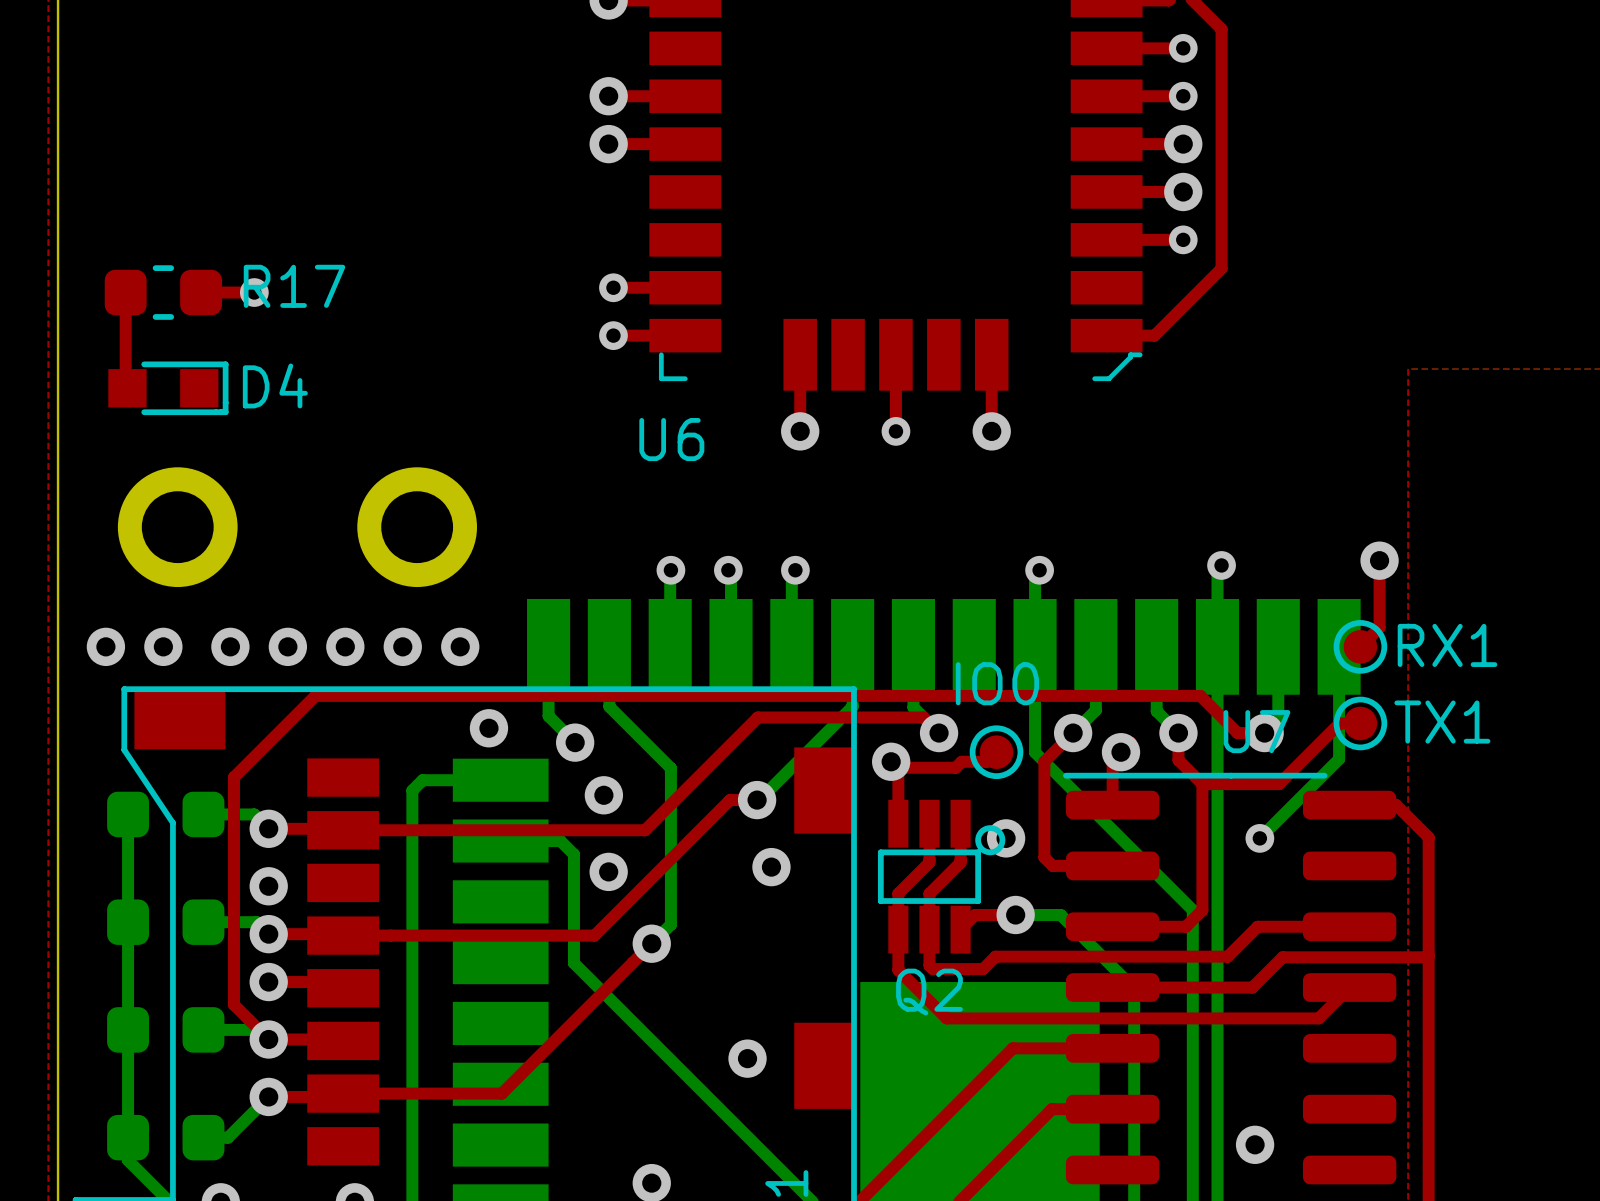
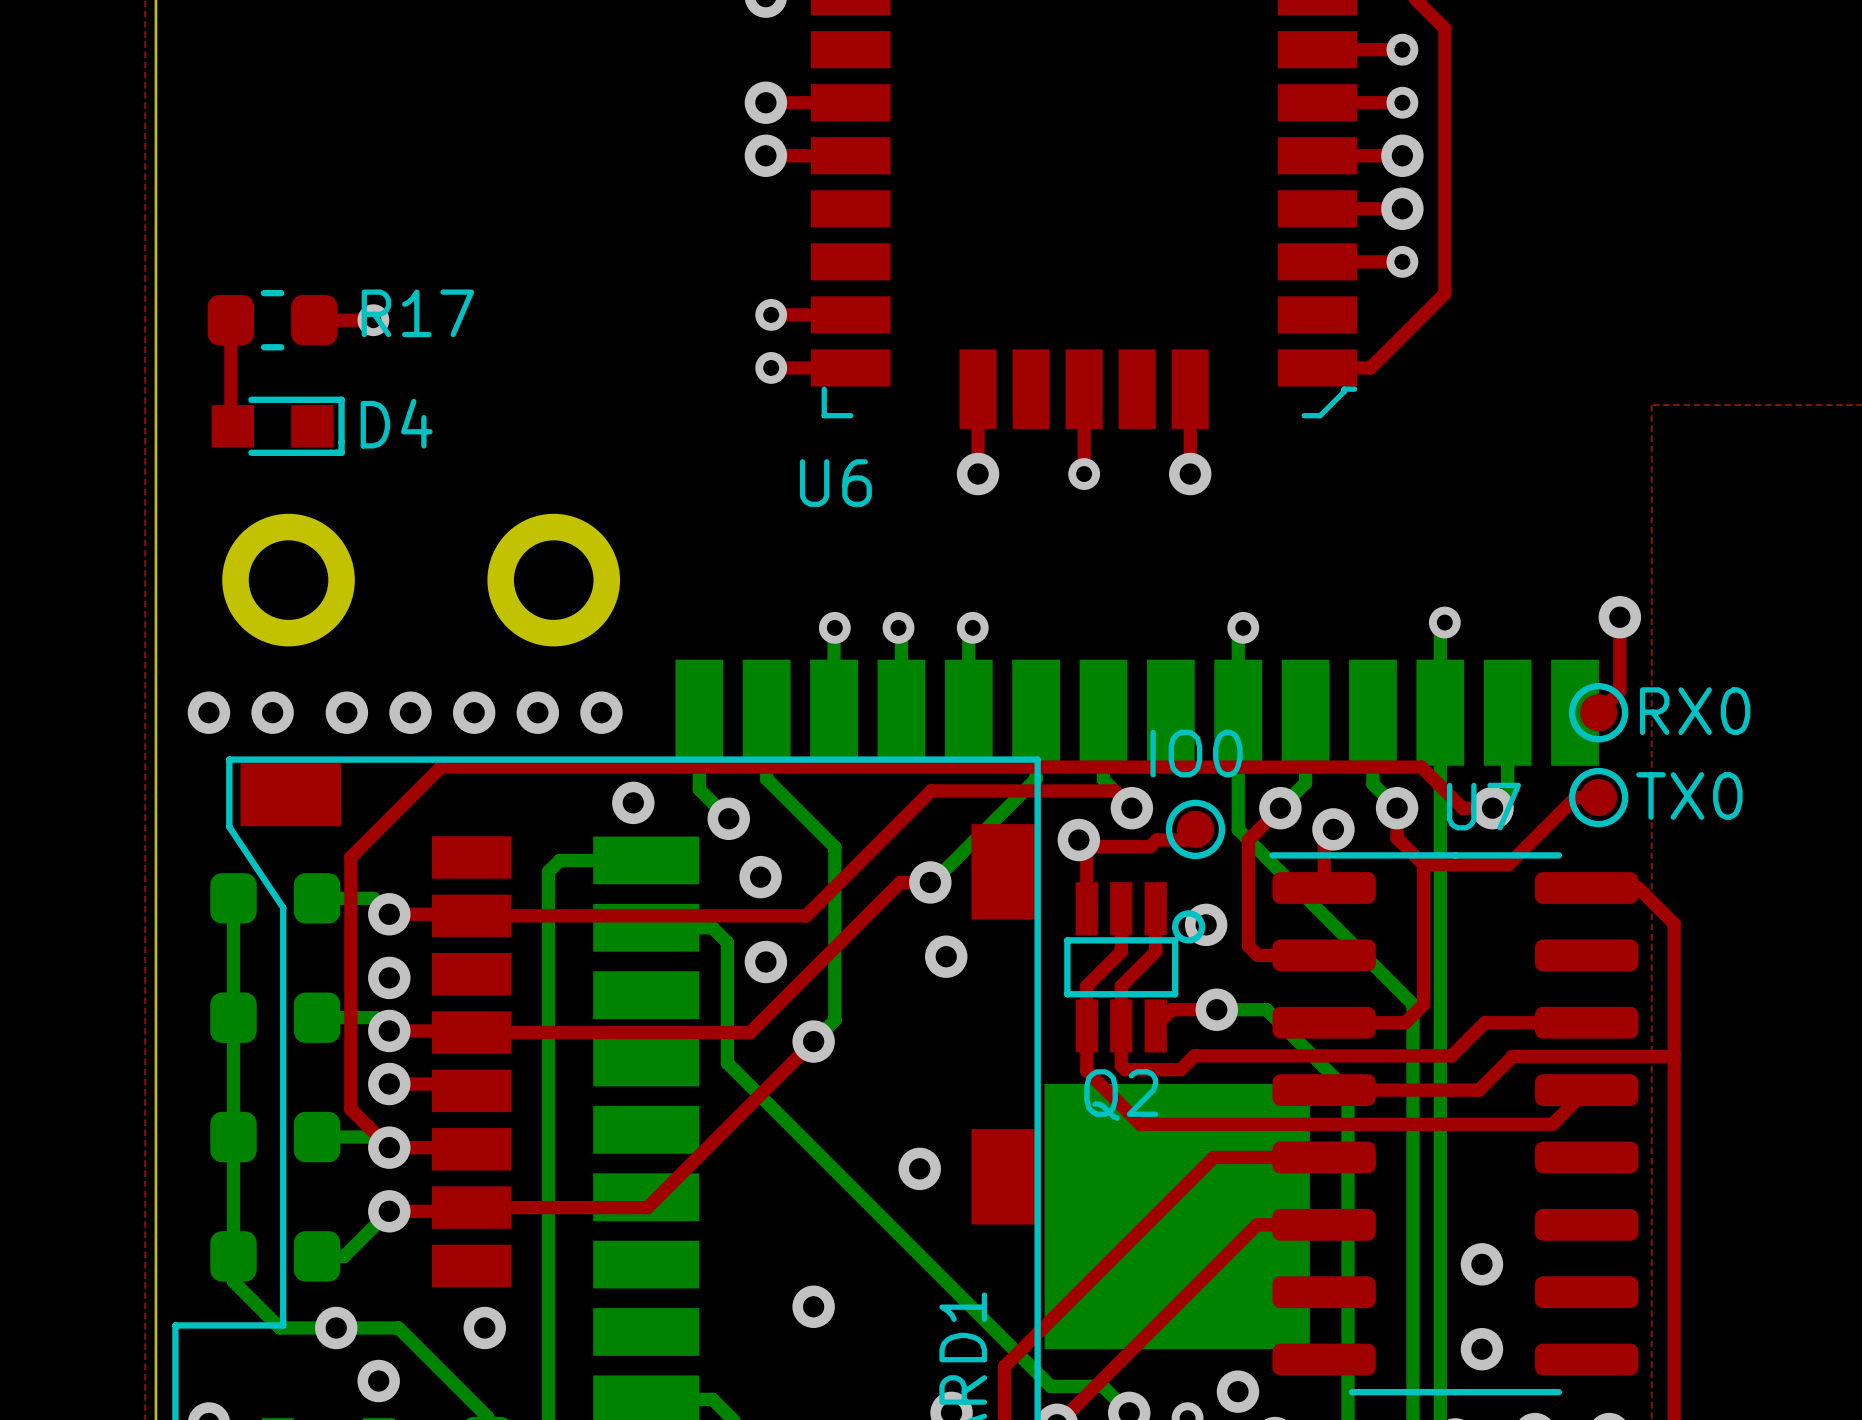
RX1 name: RX1 (1447, 645) -> RX0 (1695, 711)
bottom track: (1339, 646) (1339, 759) (1259, 838) -> none
TX1 name: TX1 (1442, 722) -> TX0 (1689, 795)
via: (1259, 838) -> none

